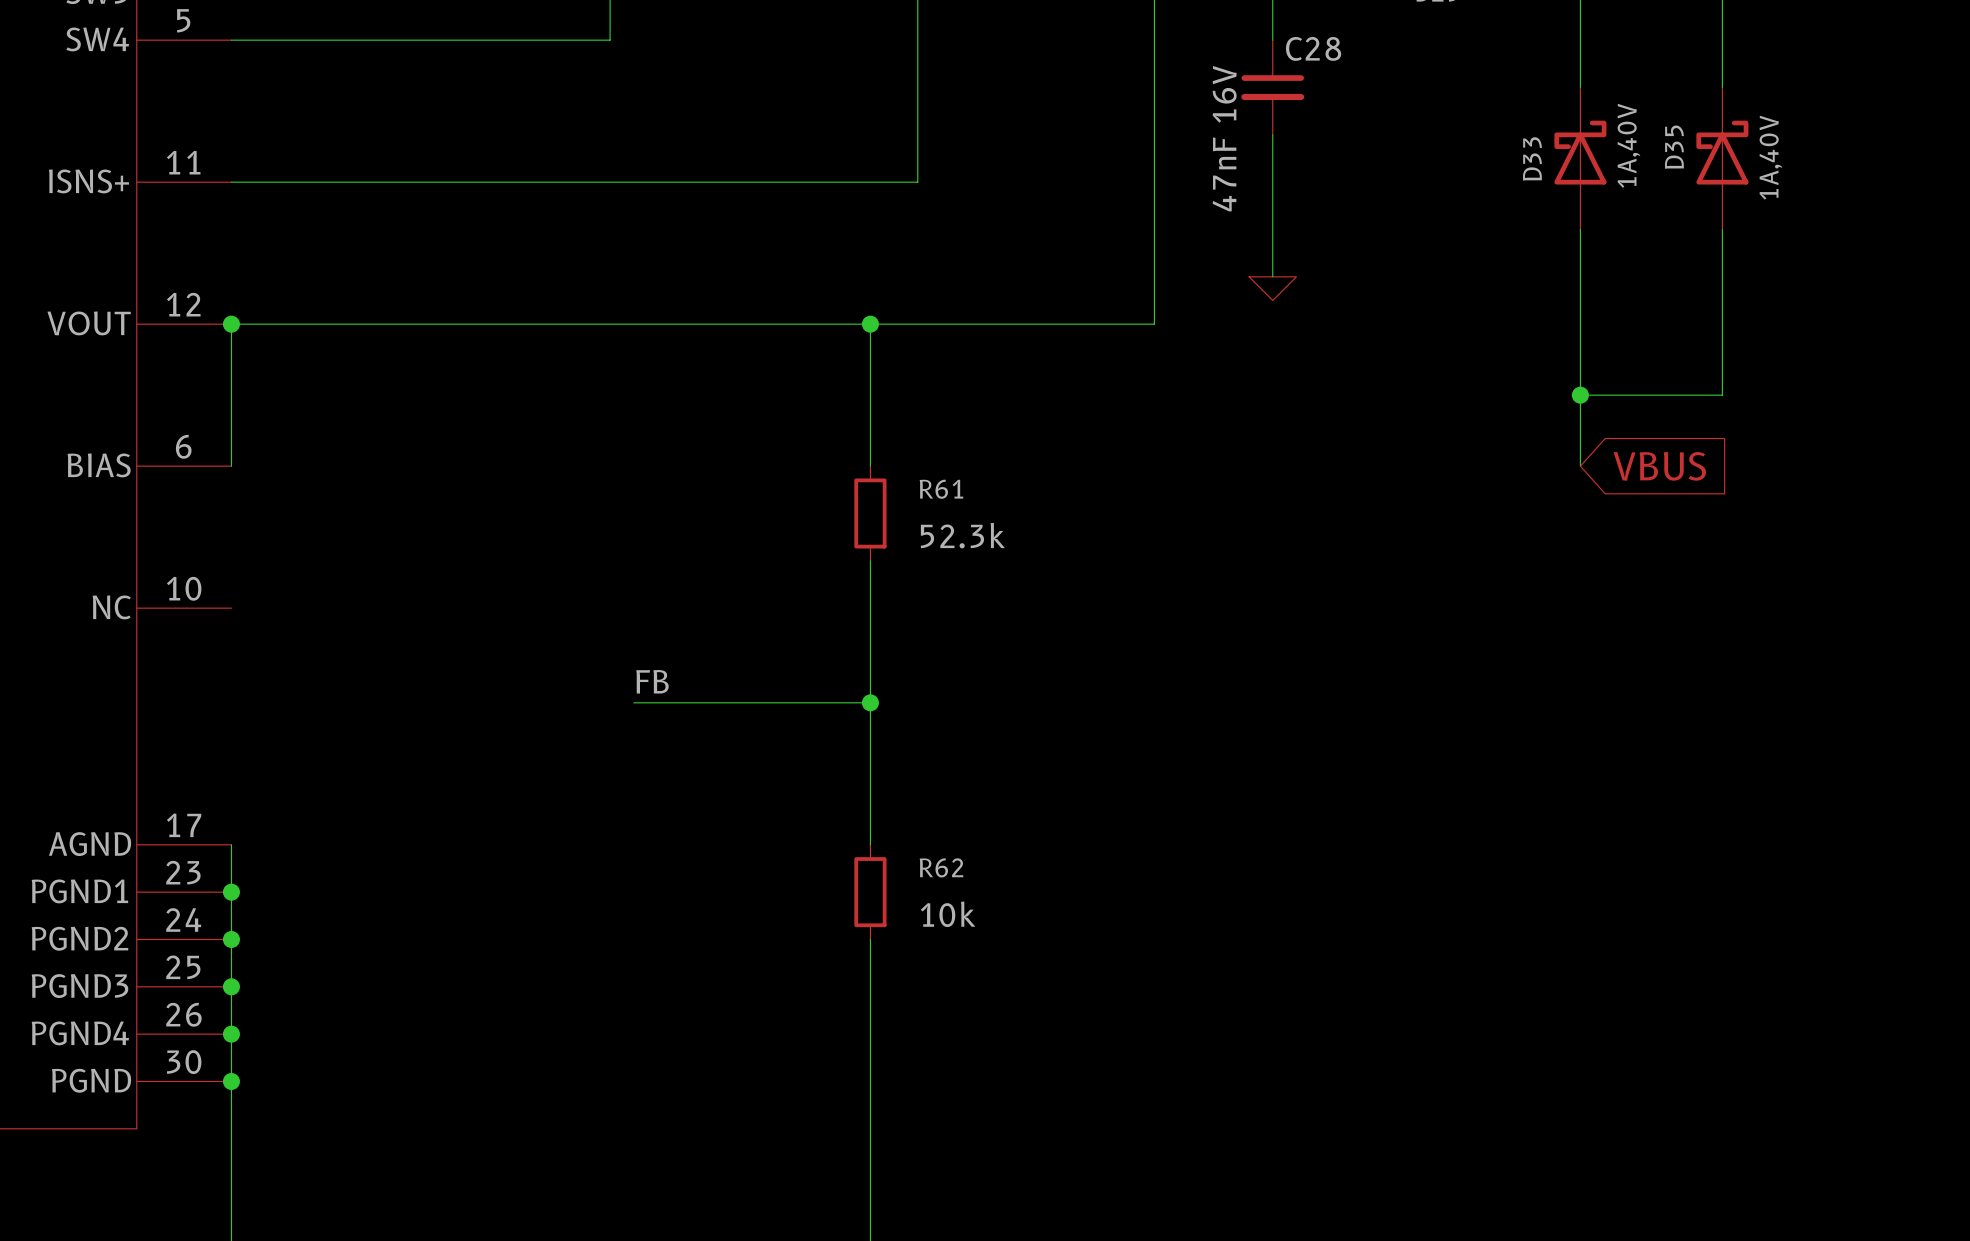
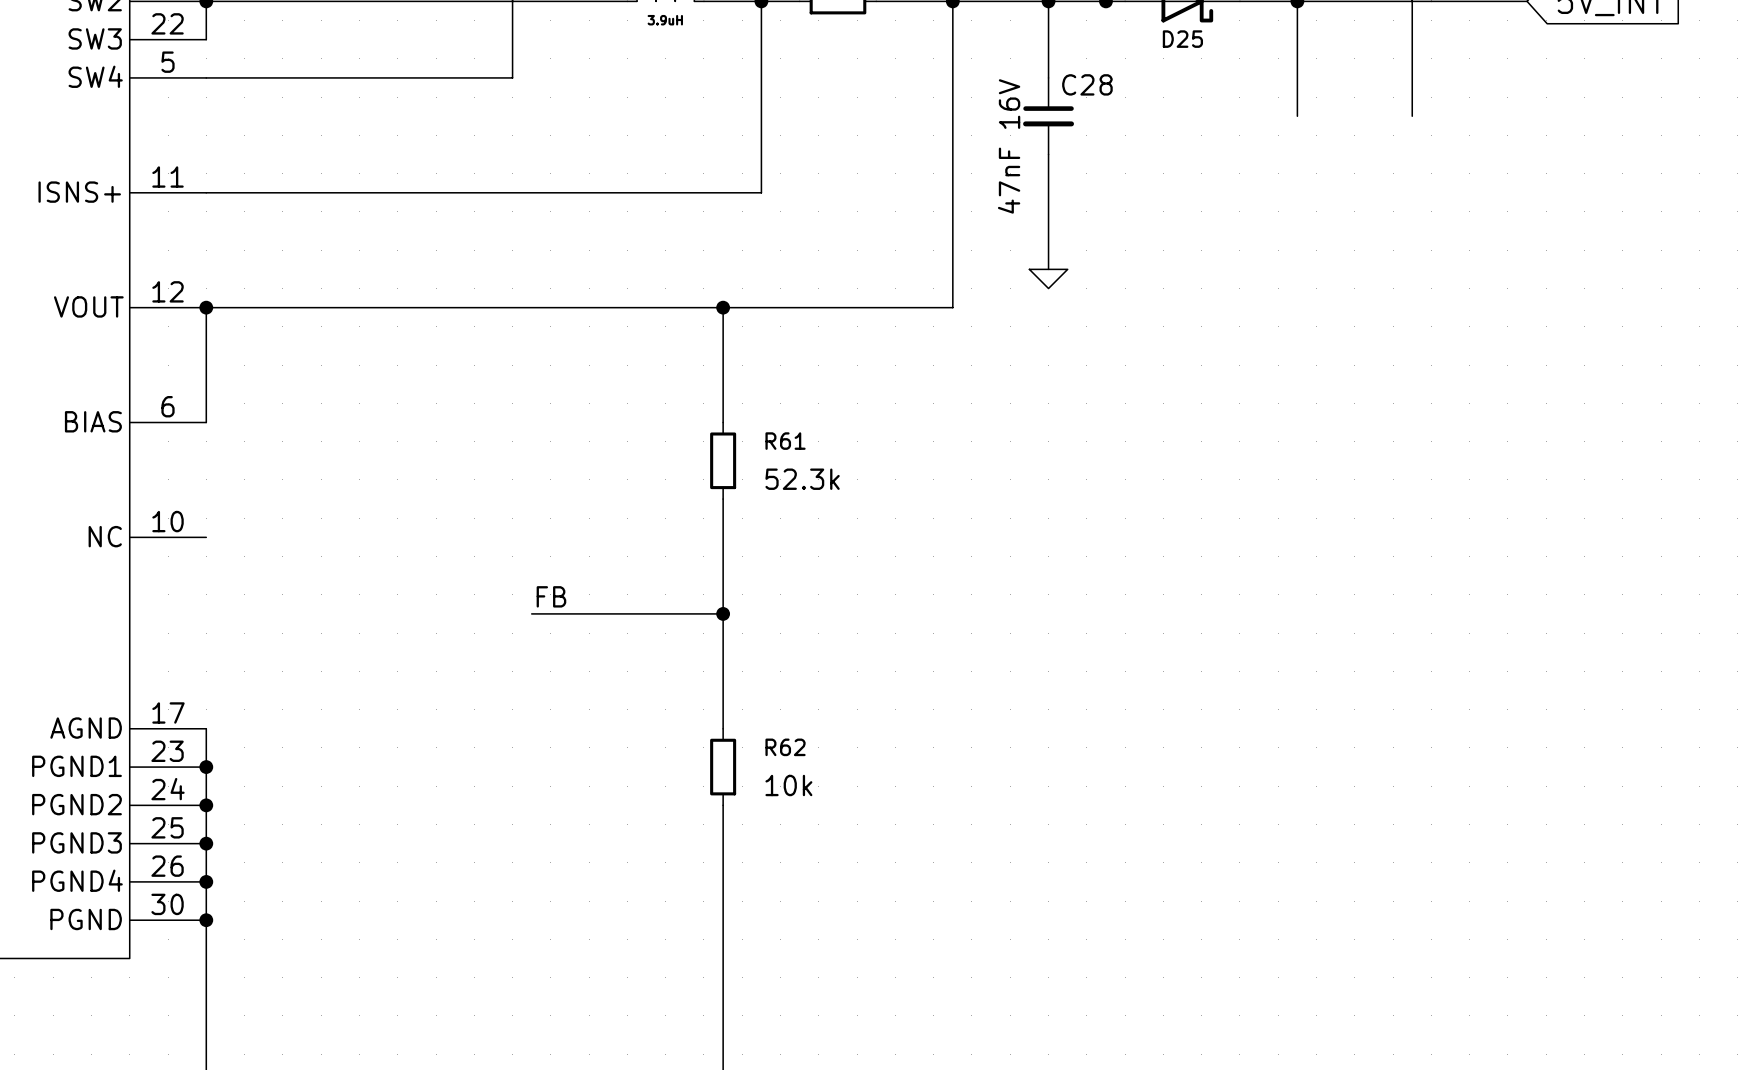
D33: 1A,40V (1580, 158) -> none
D35: 1A,40V (1722, 158) -> none
wire: (1580, 229) (1580, 466) -> none
wire: (1722, 229) (1722, 395) (1580, 395) -> none
junction: (1580, 395) -> none
global label: VBUS (1659, 466) -> none

